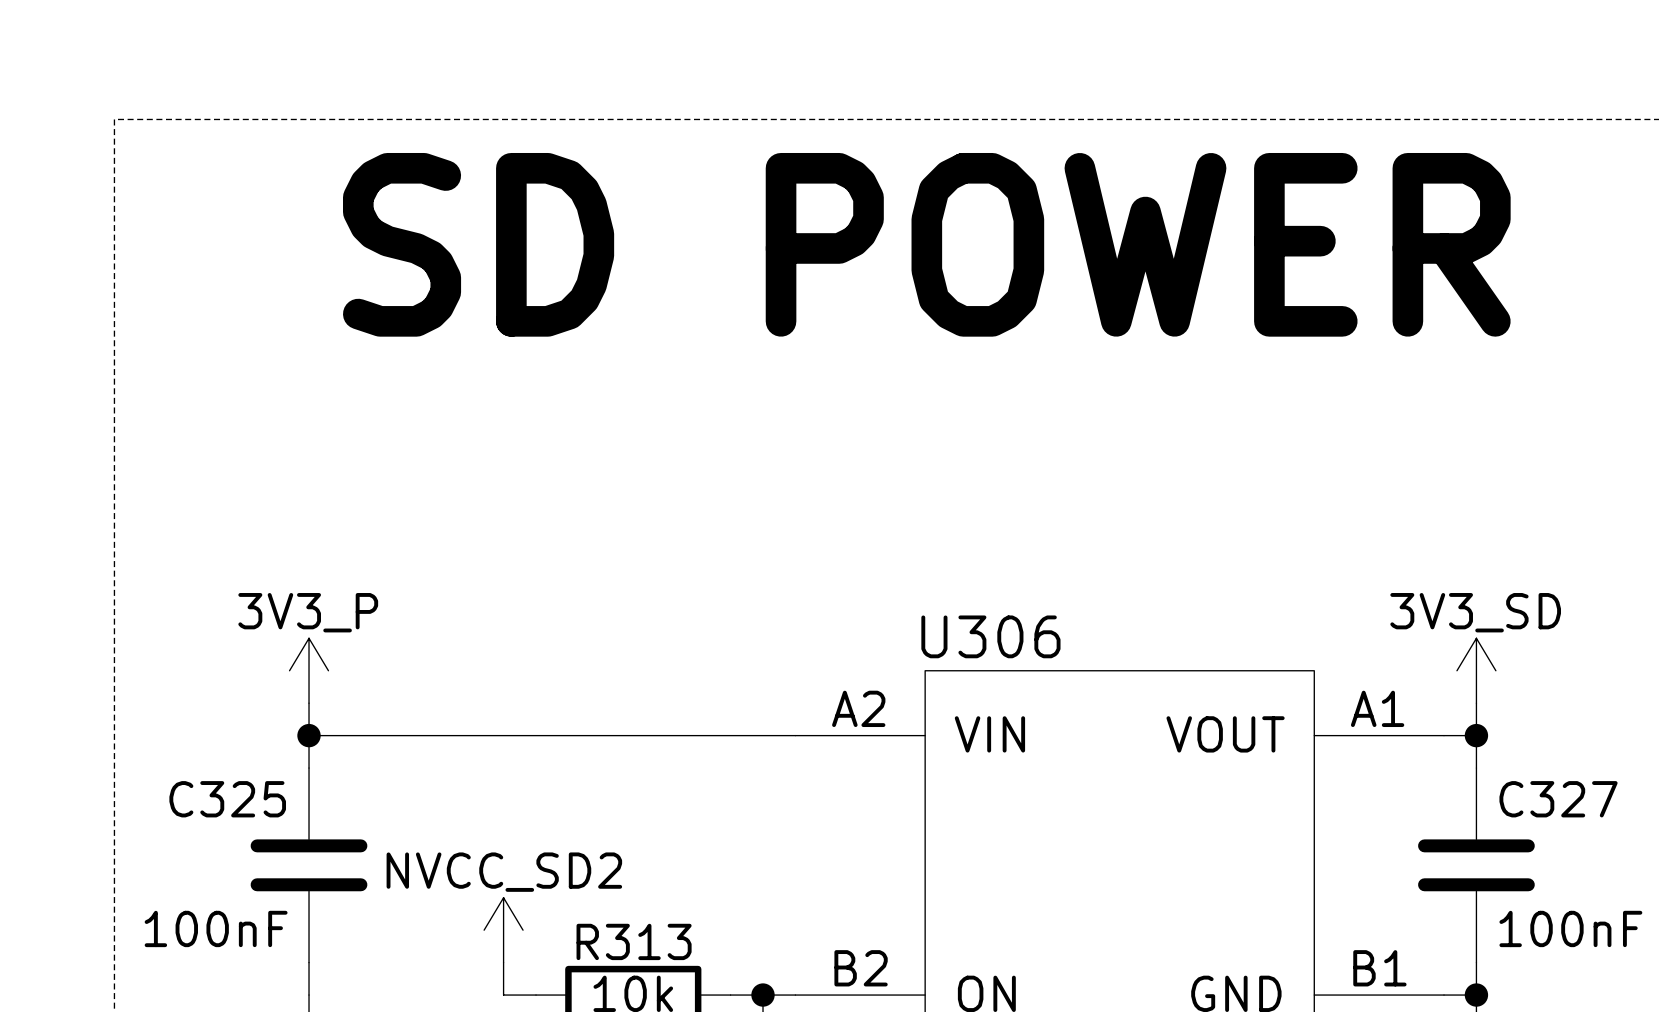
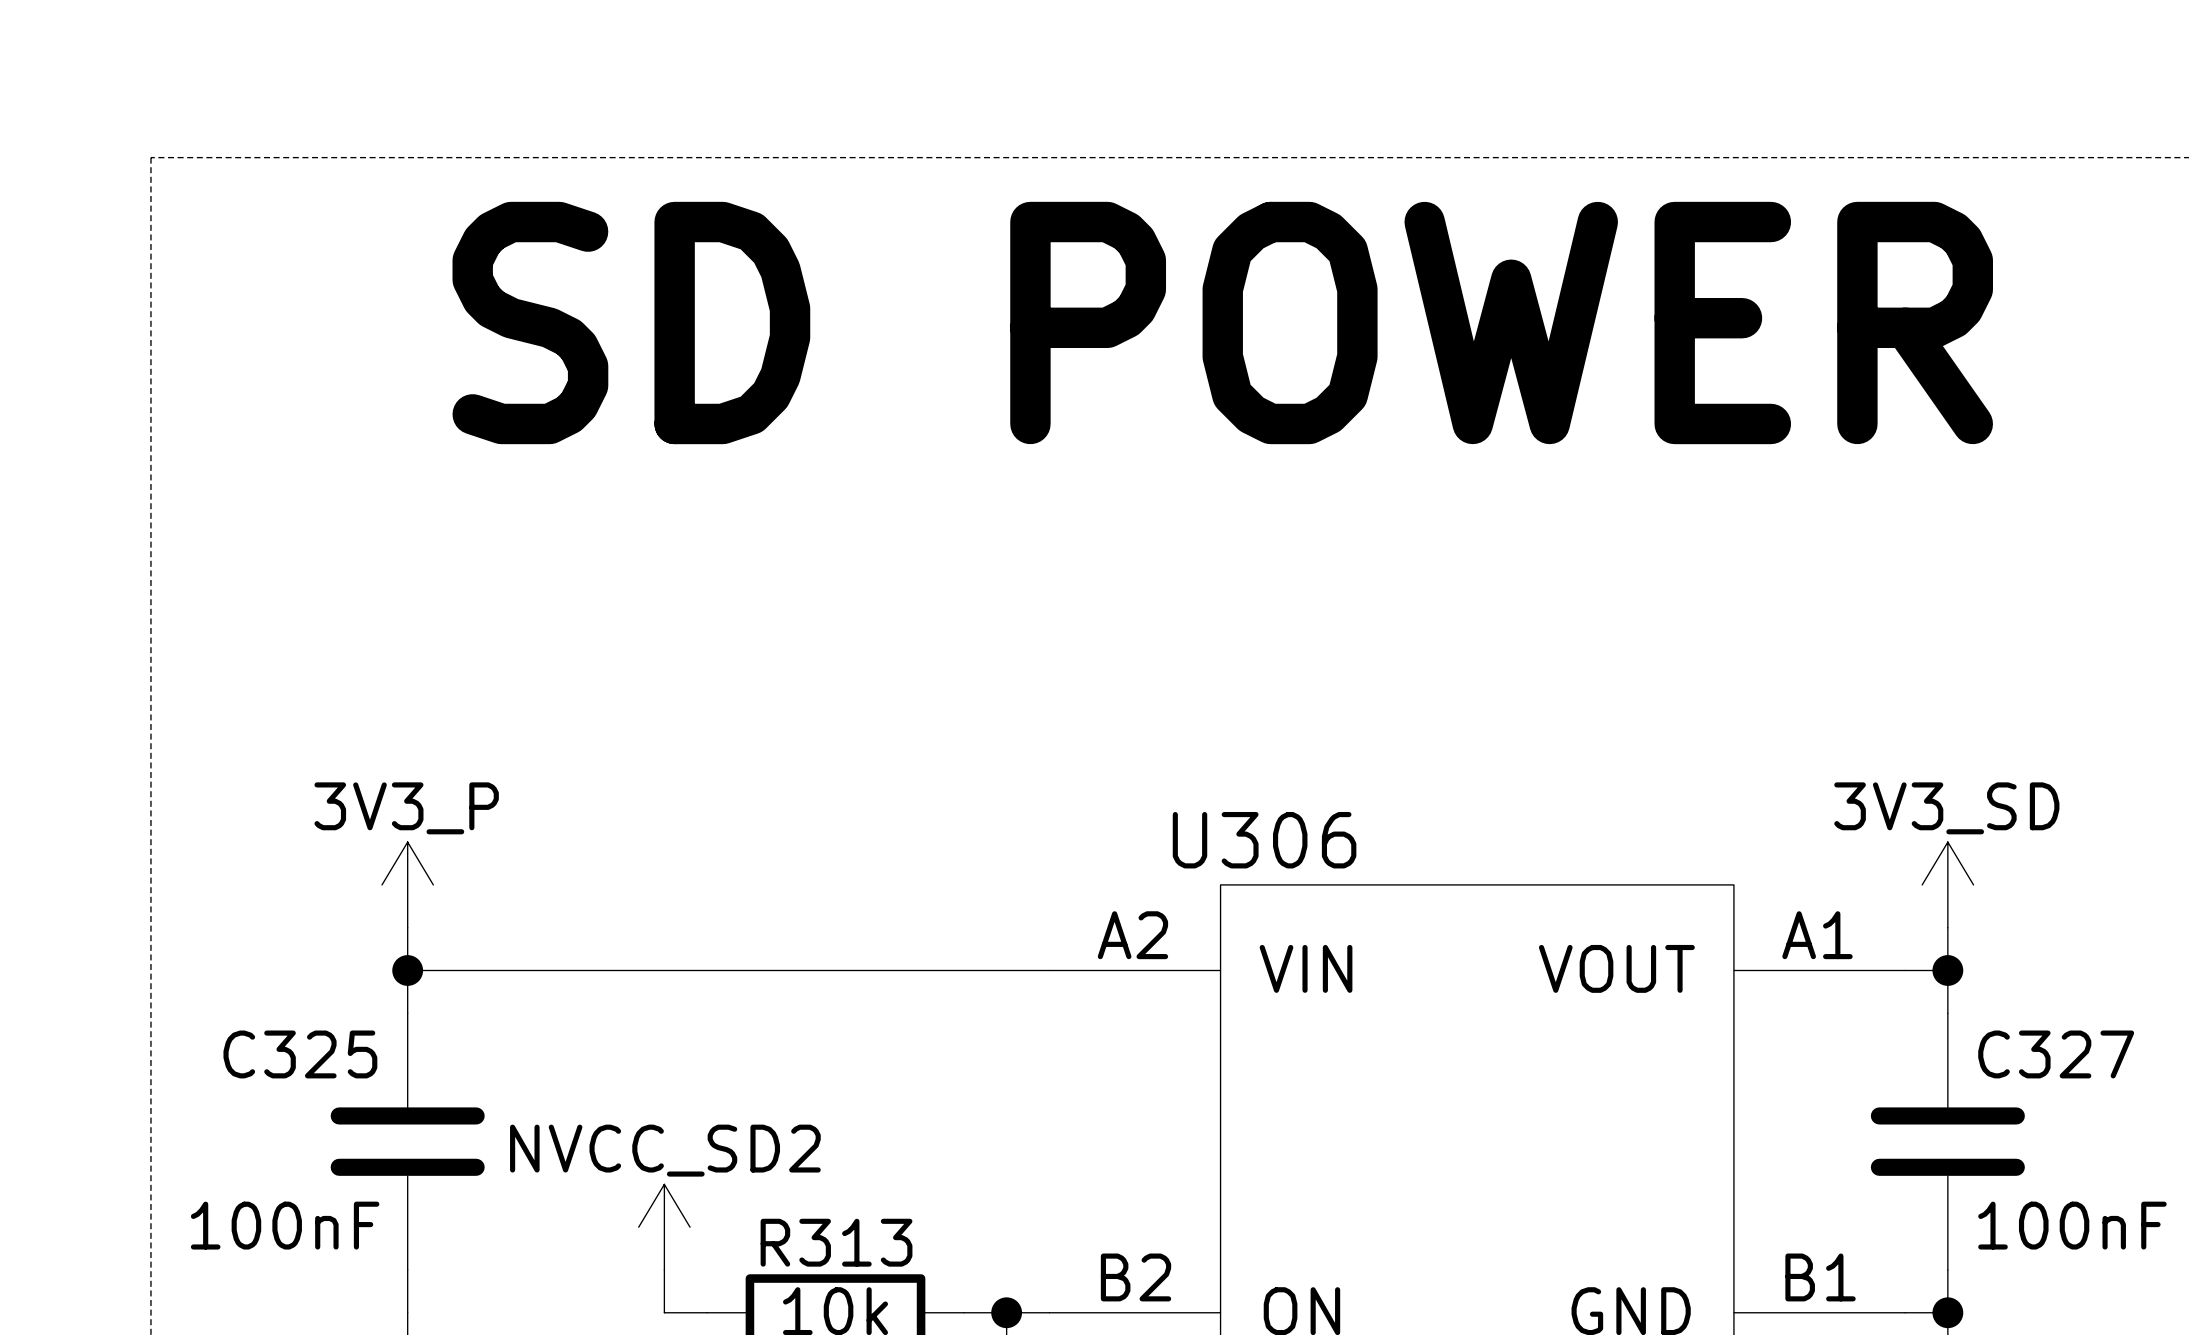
U306 name position: U306 (990, 636) -> U306 (1264, 840)

